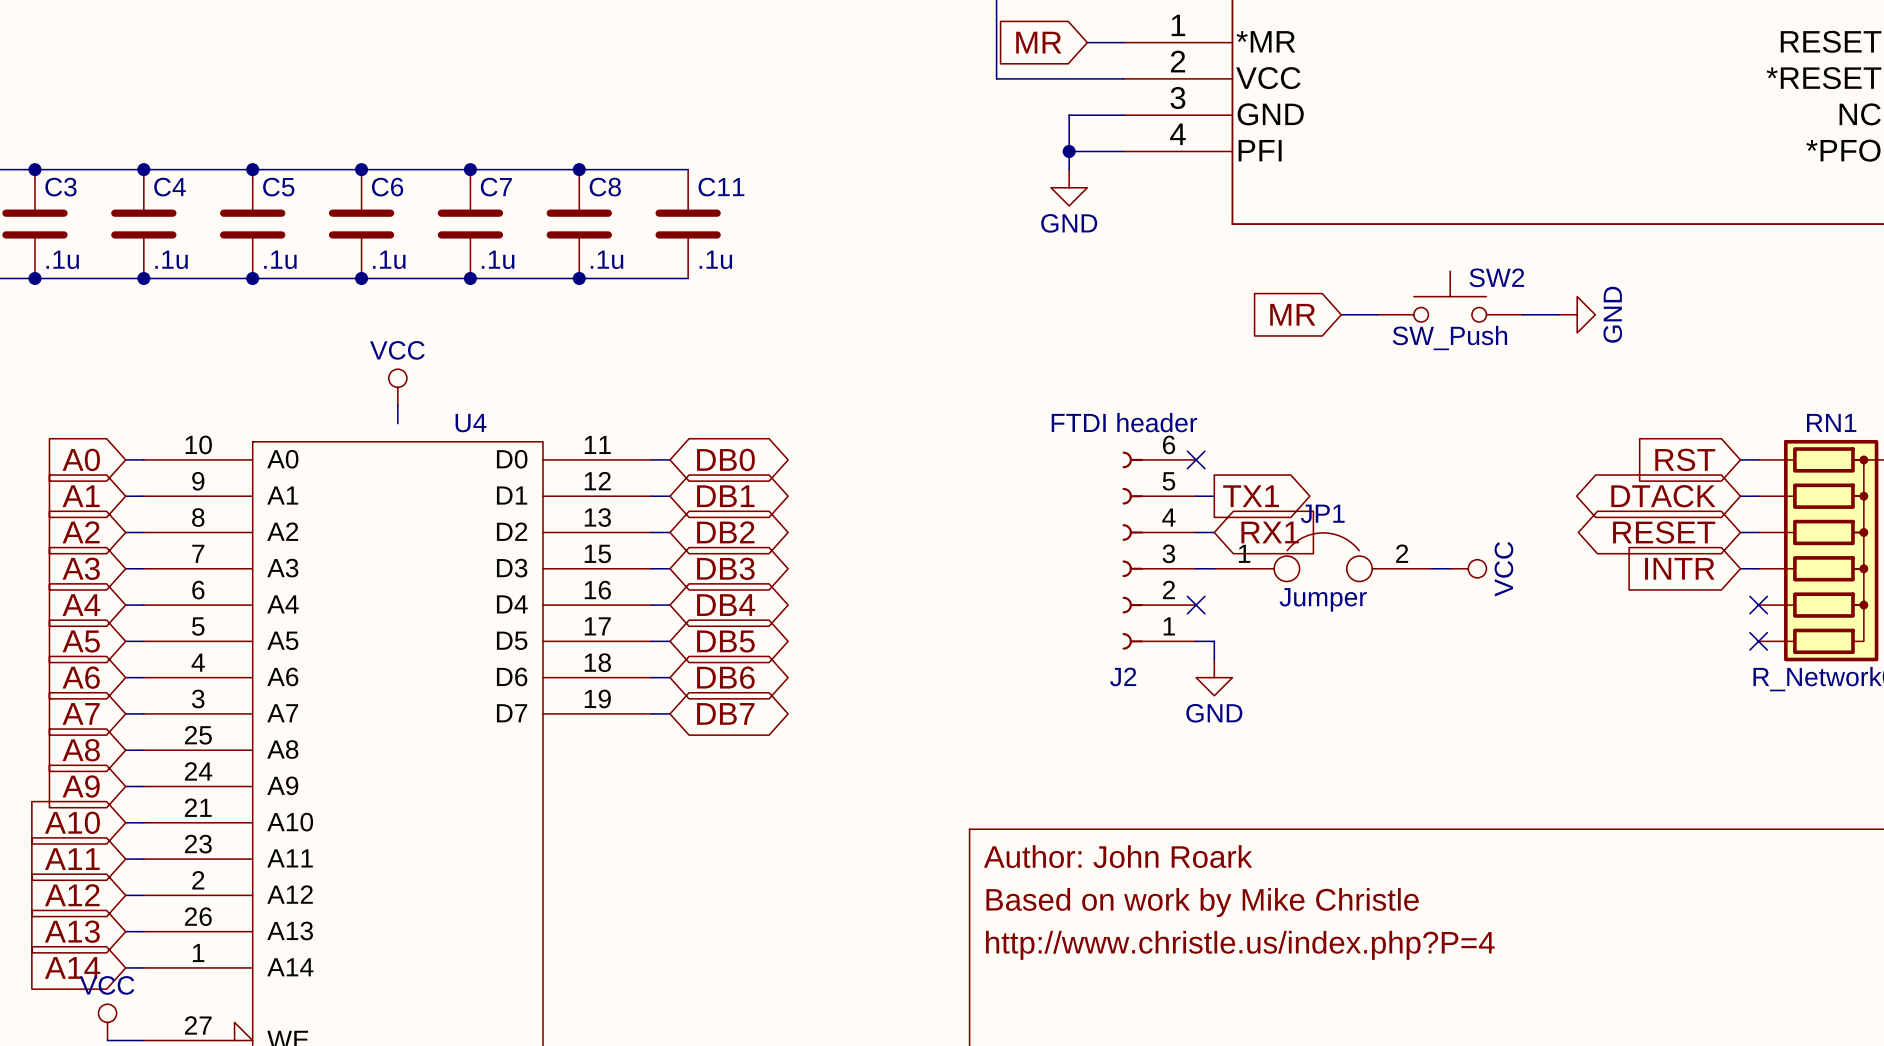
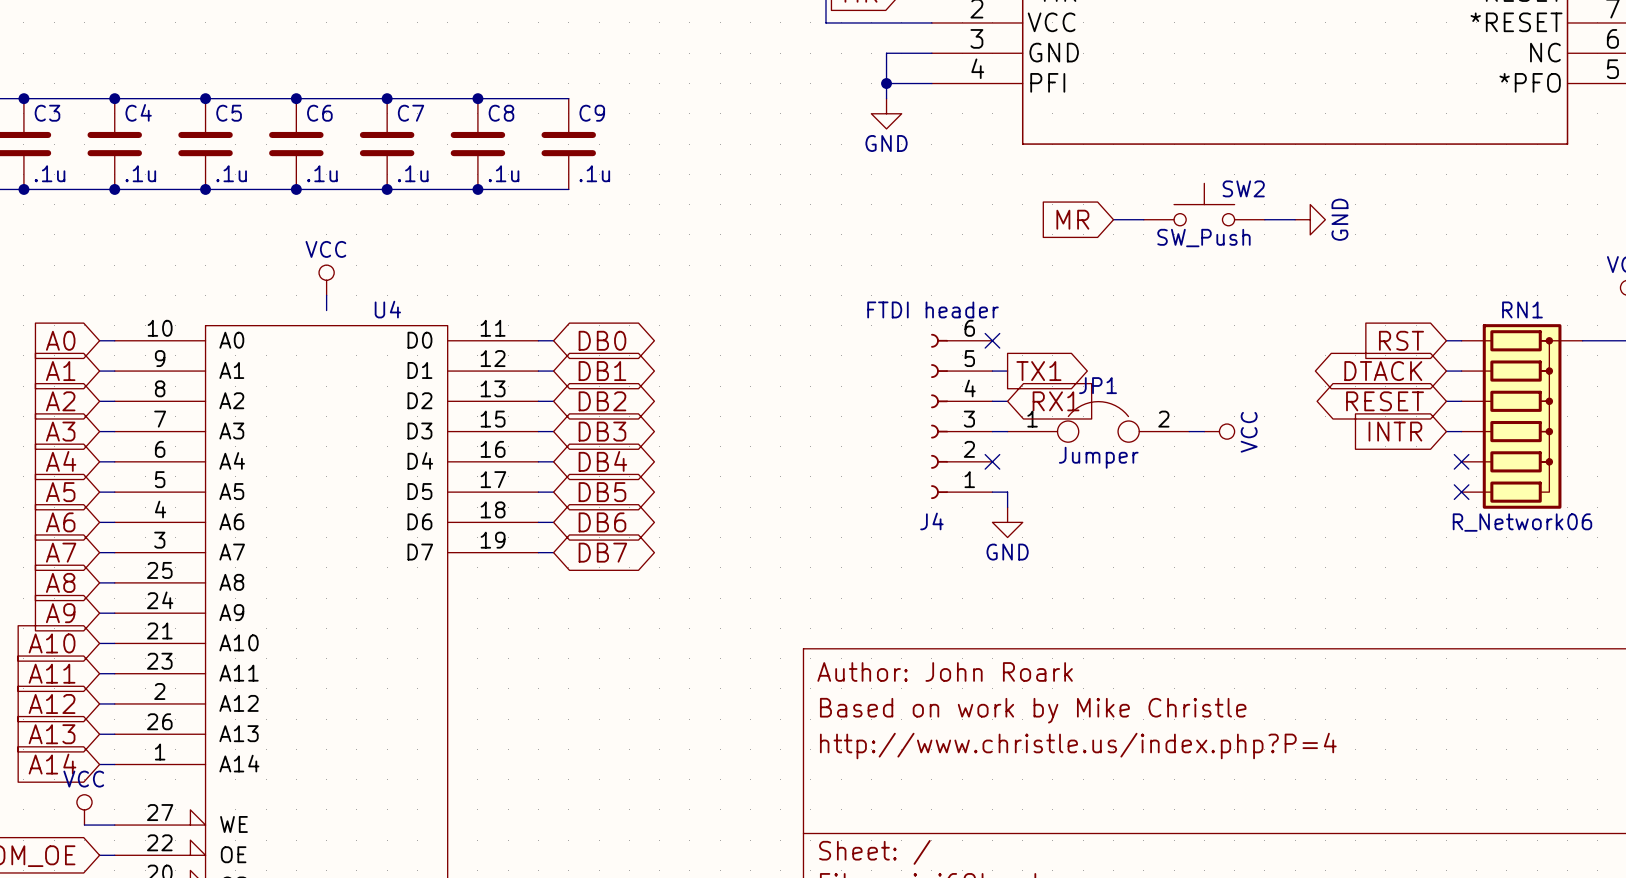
C11 name: C11 (721, 187) -> C9 (592, 113)
J2 name: J2 (1123, 676) -> J4 (931, 521)

